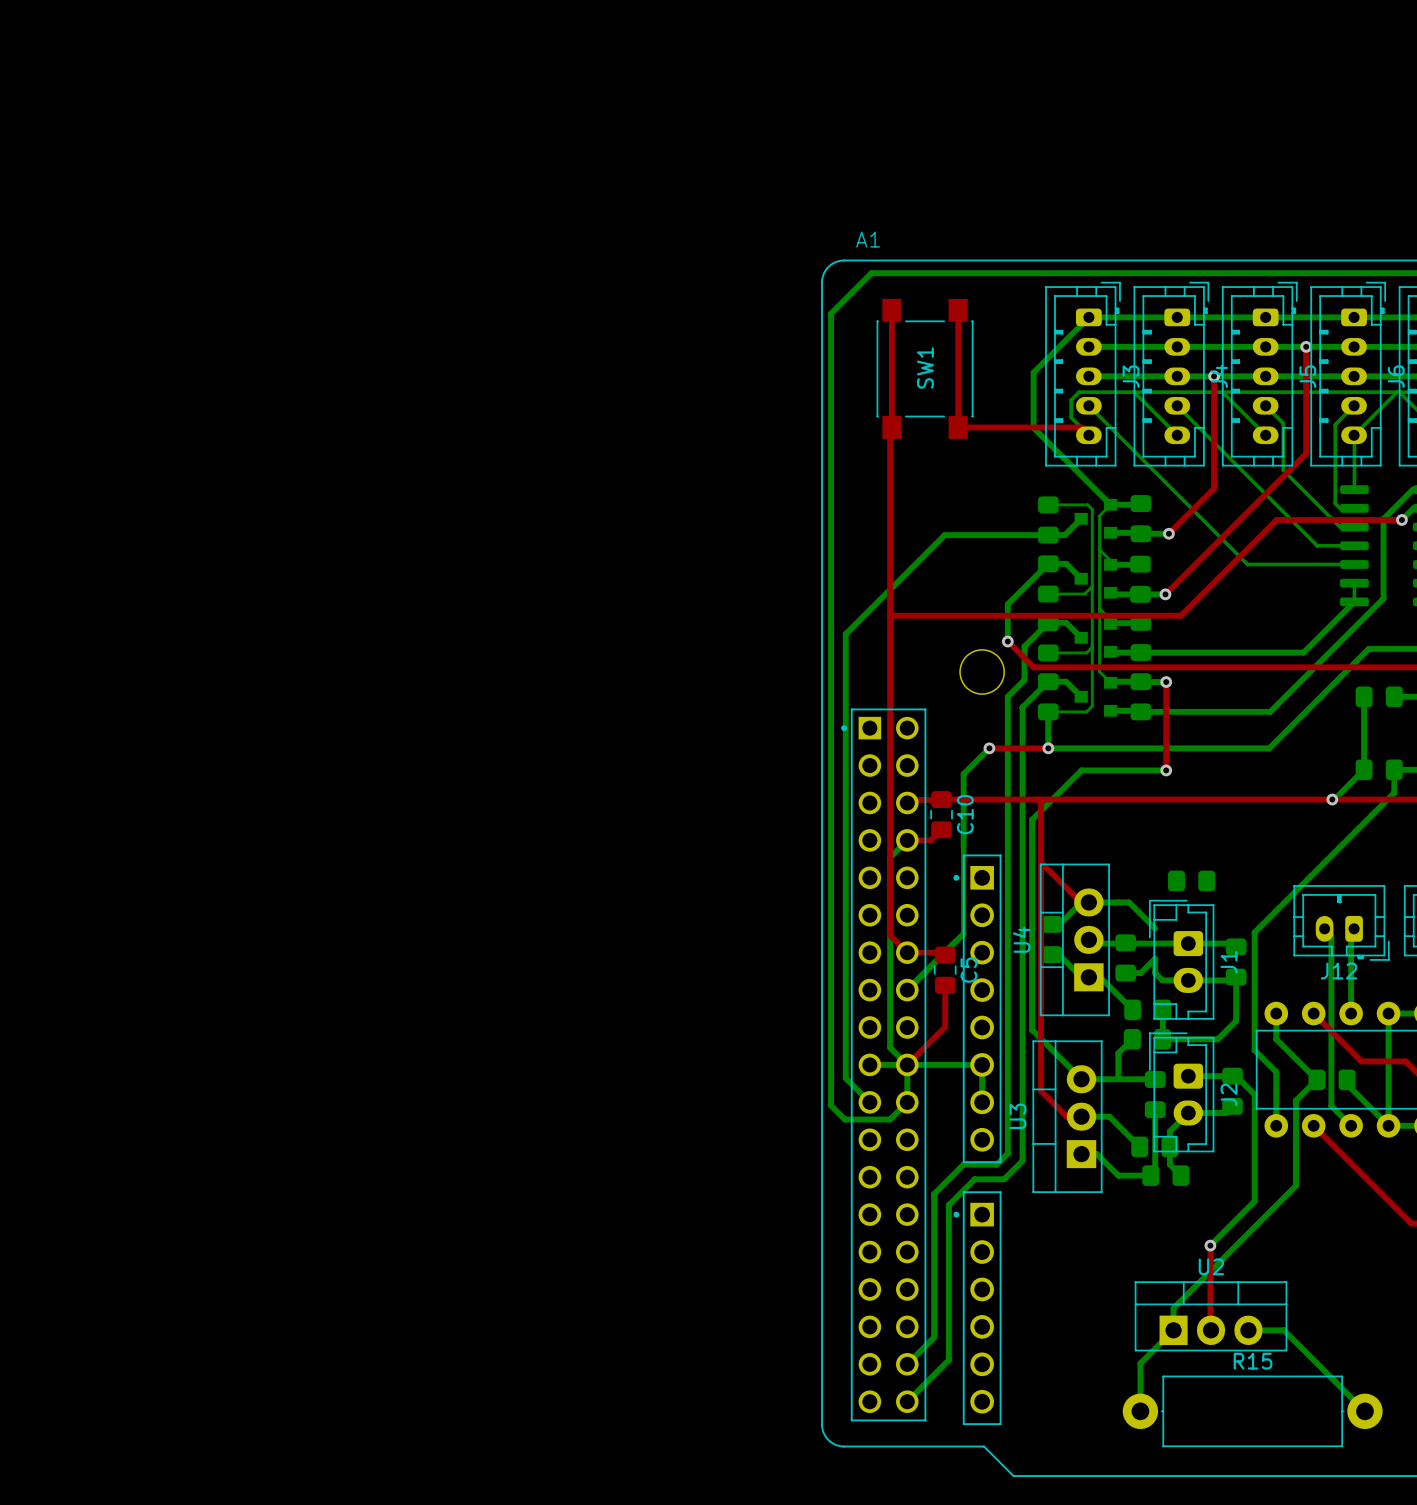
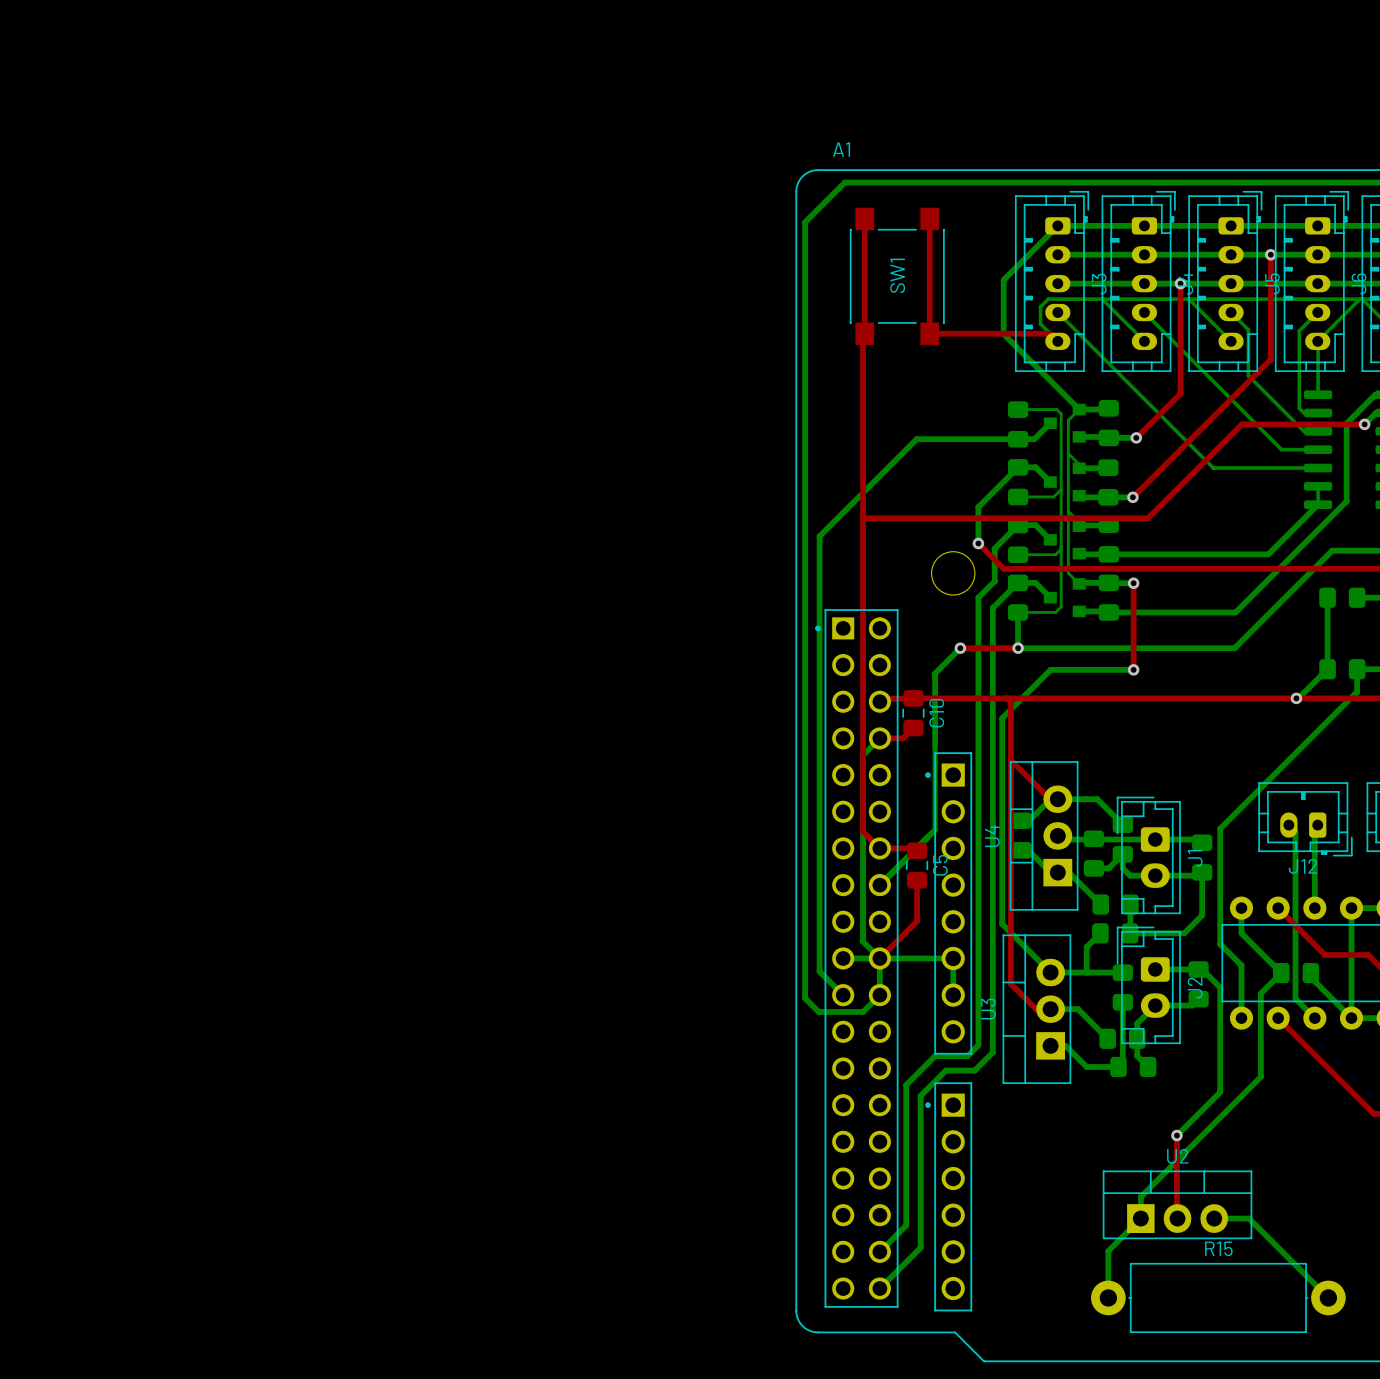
part rotation: 0° (1191, 880) -> 90° clockwise (1122, 839)
part position: (1191, 880) -> (1122, 839)

